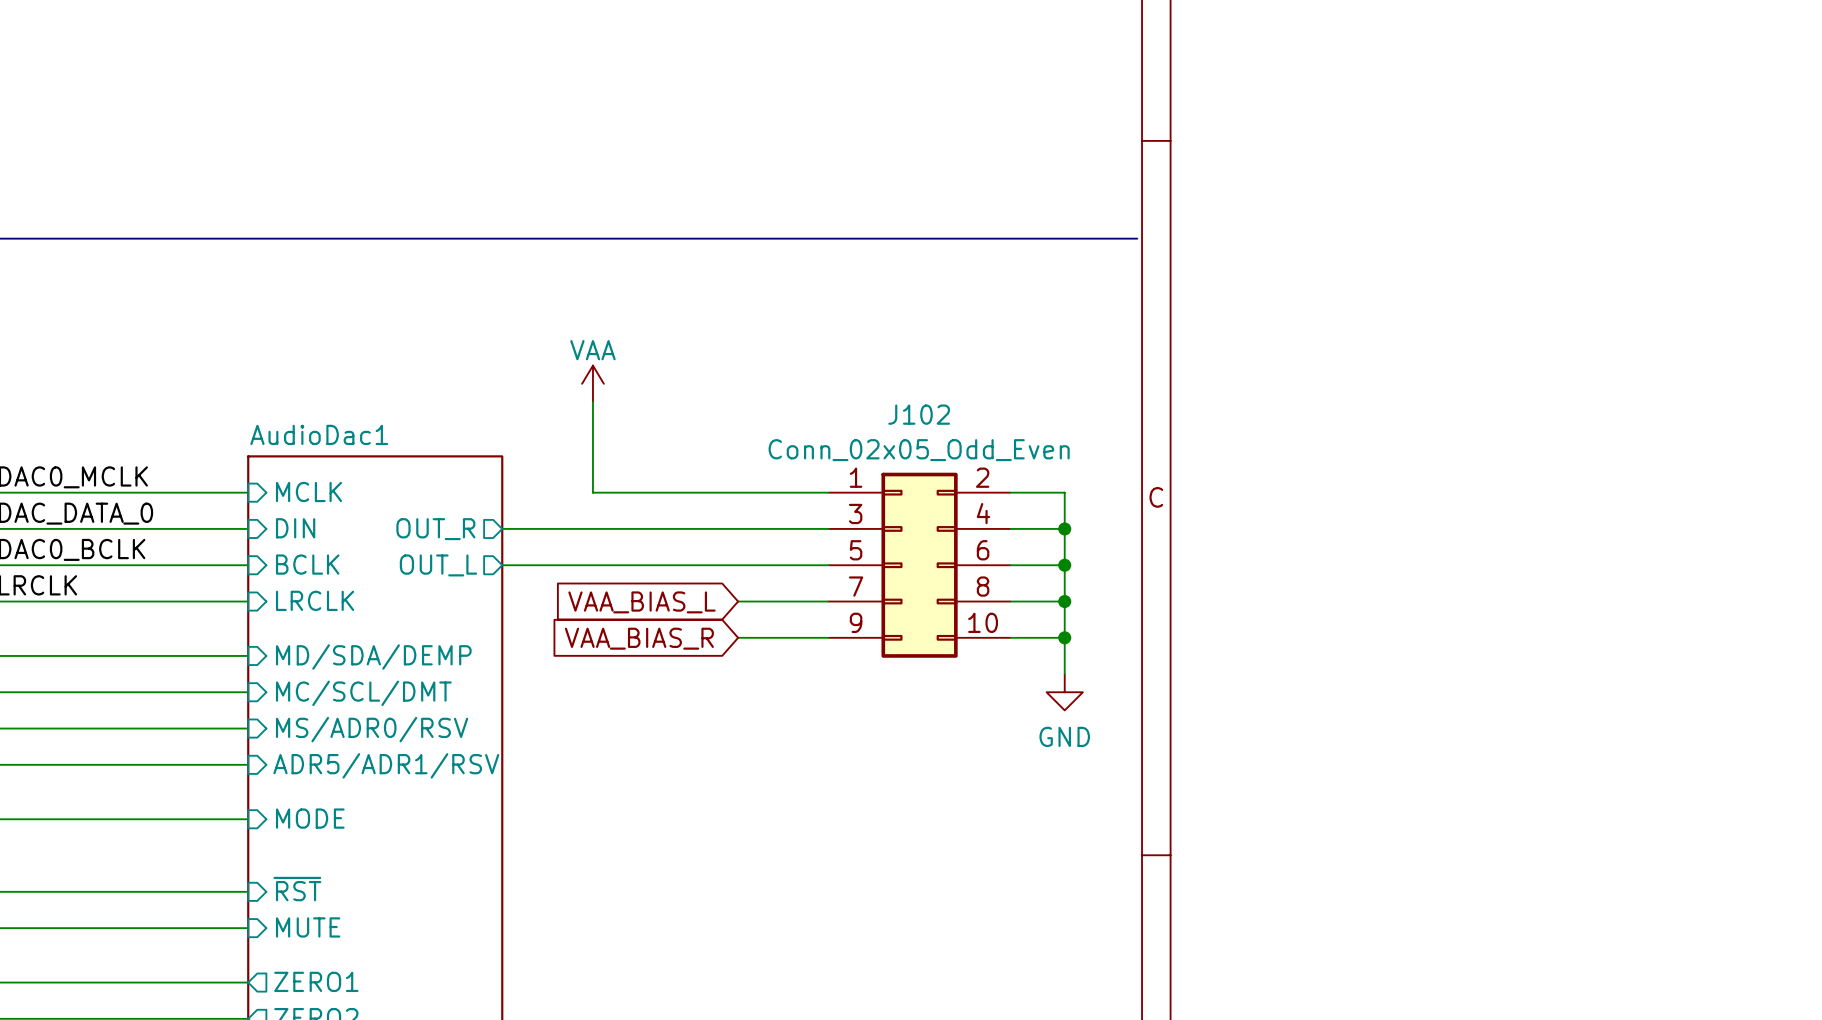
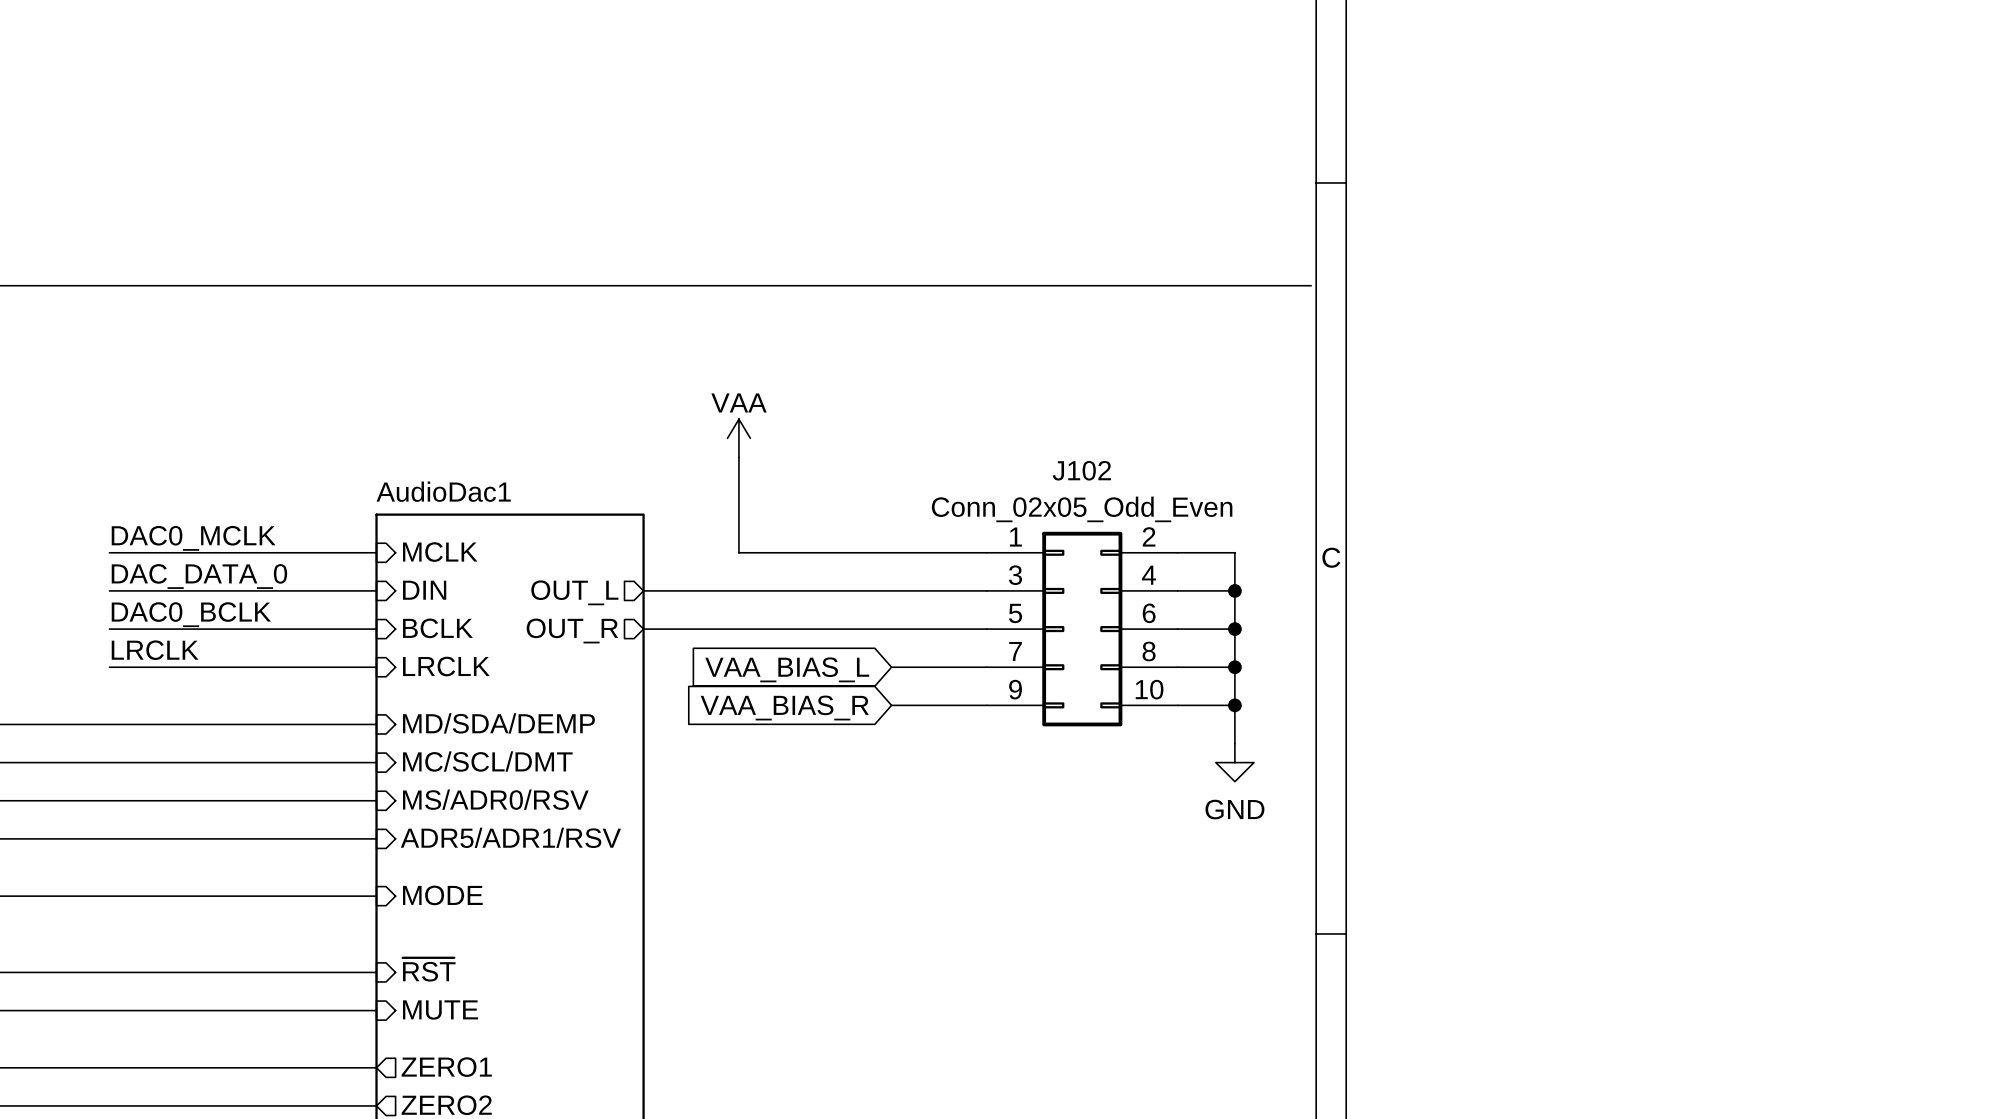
sheet pin: OUT_R (435, 529) -> OUT_L (574, 592)
sheet pin: OUT_L (438, 565) -> OUT_R (572, 630)

